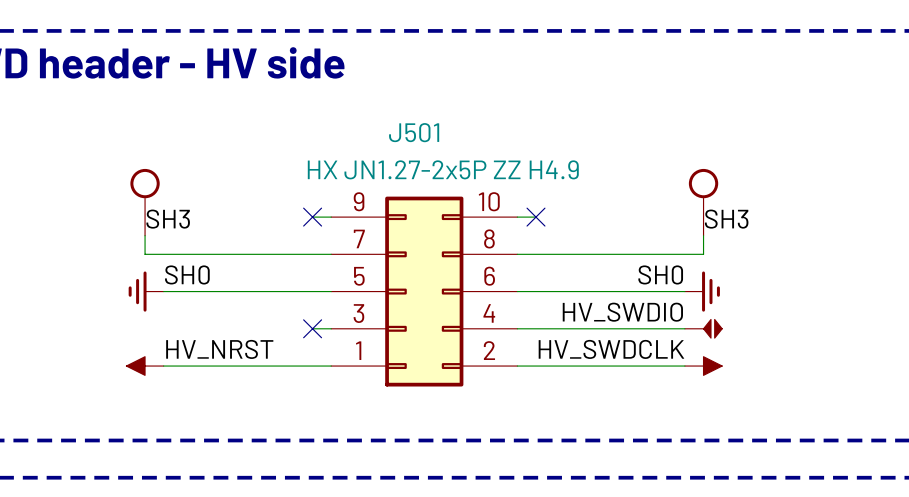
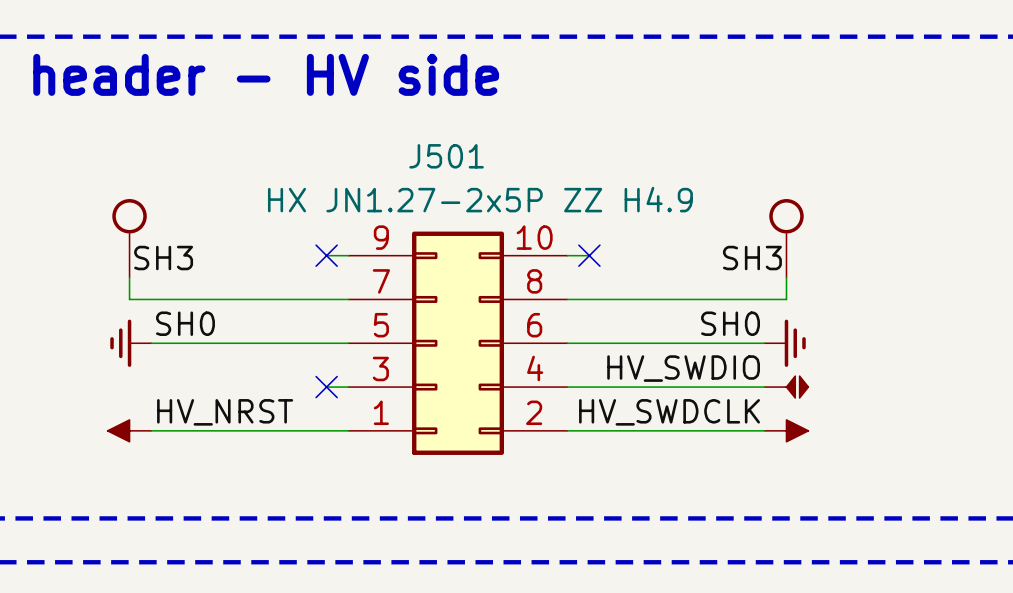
label position: SH3 (726, 219) -> SH3 (752, 258)

